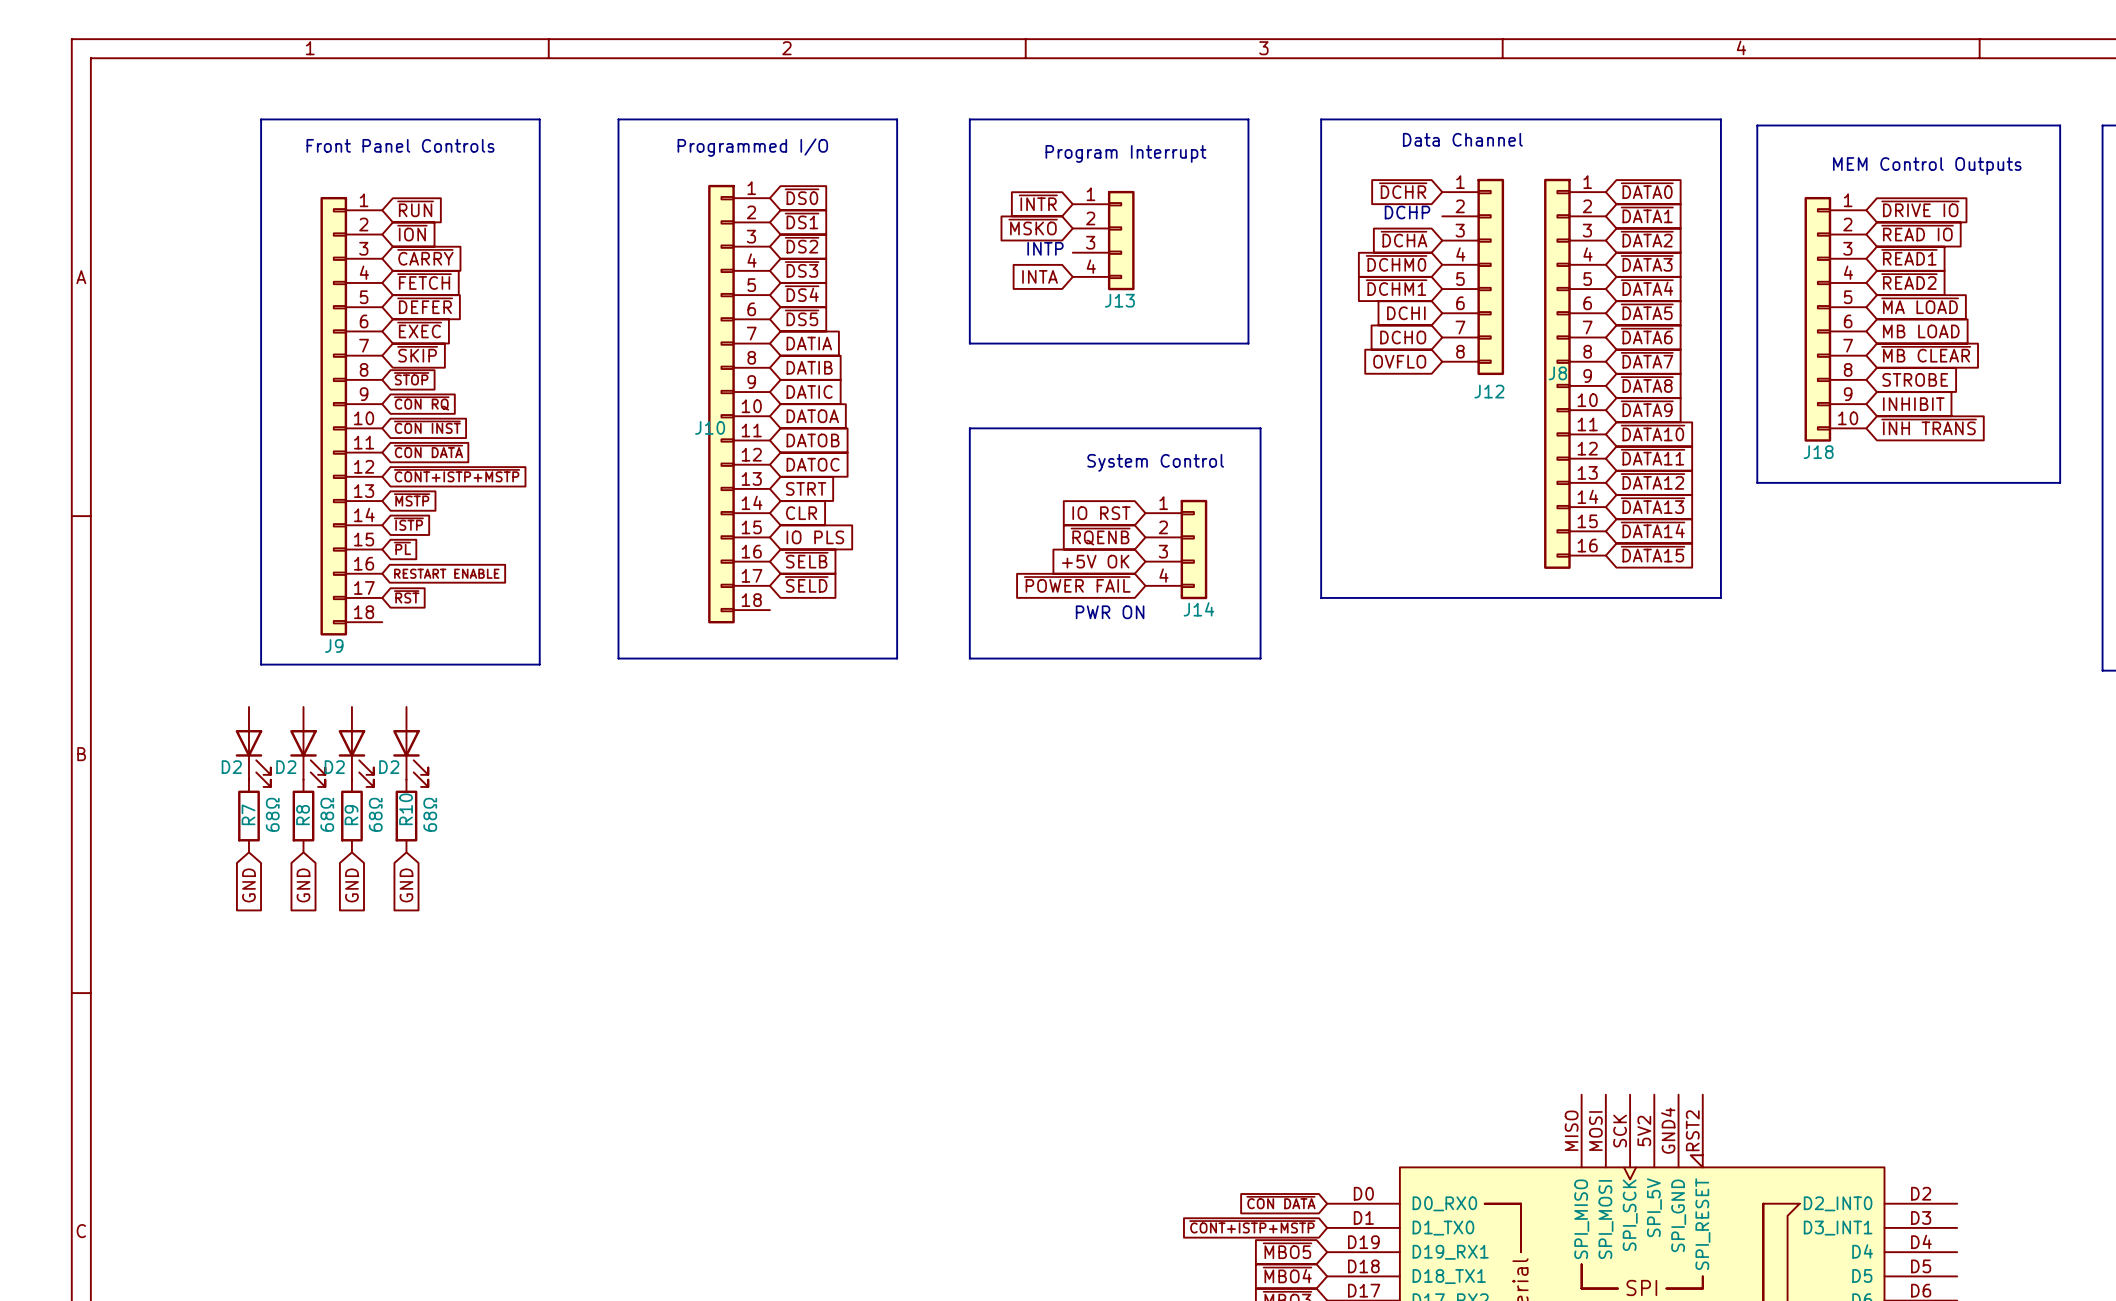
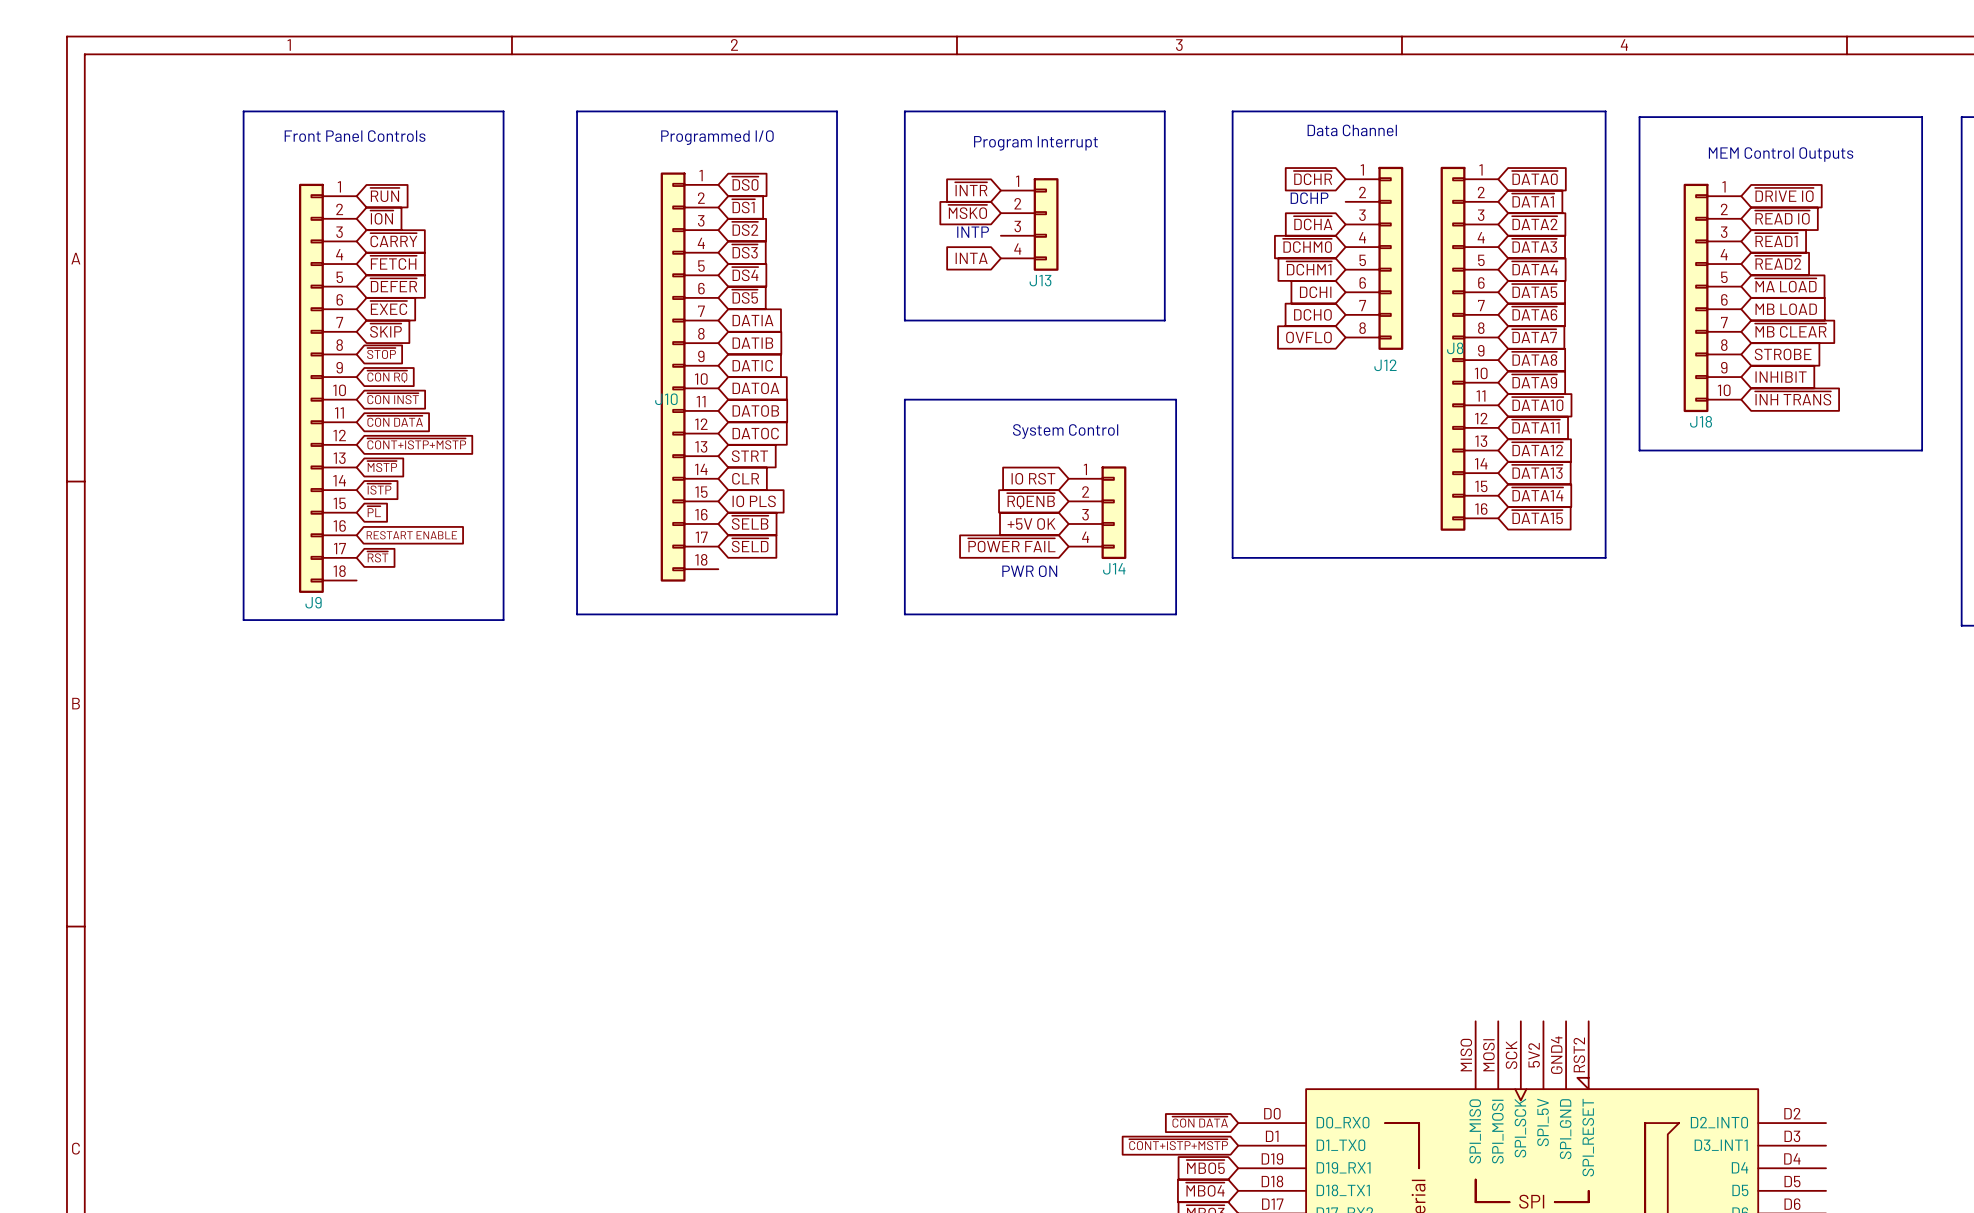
D2: (253, 746) -> none
D2: (307, 746) -> none
D2: (356, 746) -> none
D2: (410, 746) -> none
R7: 68Ω (248, 816) -> none
R8: 68Ω (303, 816) -> none
R9: 68Ω (351, 816) -> none
R10: 68Ω (406, 816) -> none
global label: GND (248, 885) -> none
global label: GND (303, 885) -> none
global label: GND (351, 885) -> none
global label: GND (406, 885) -> none

